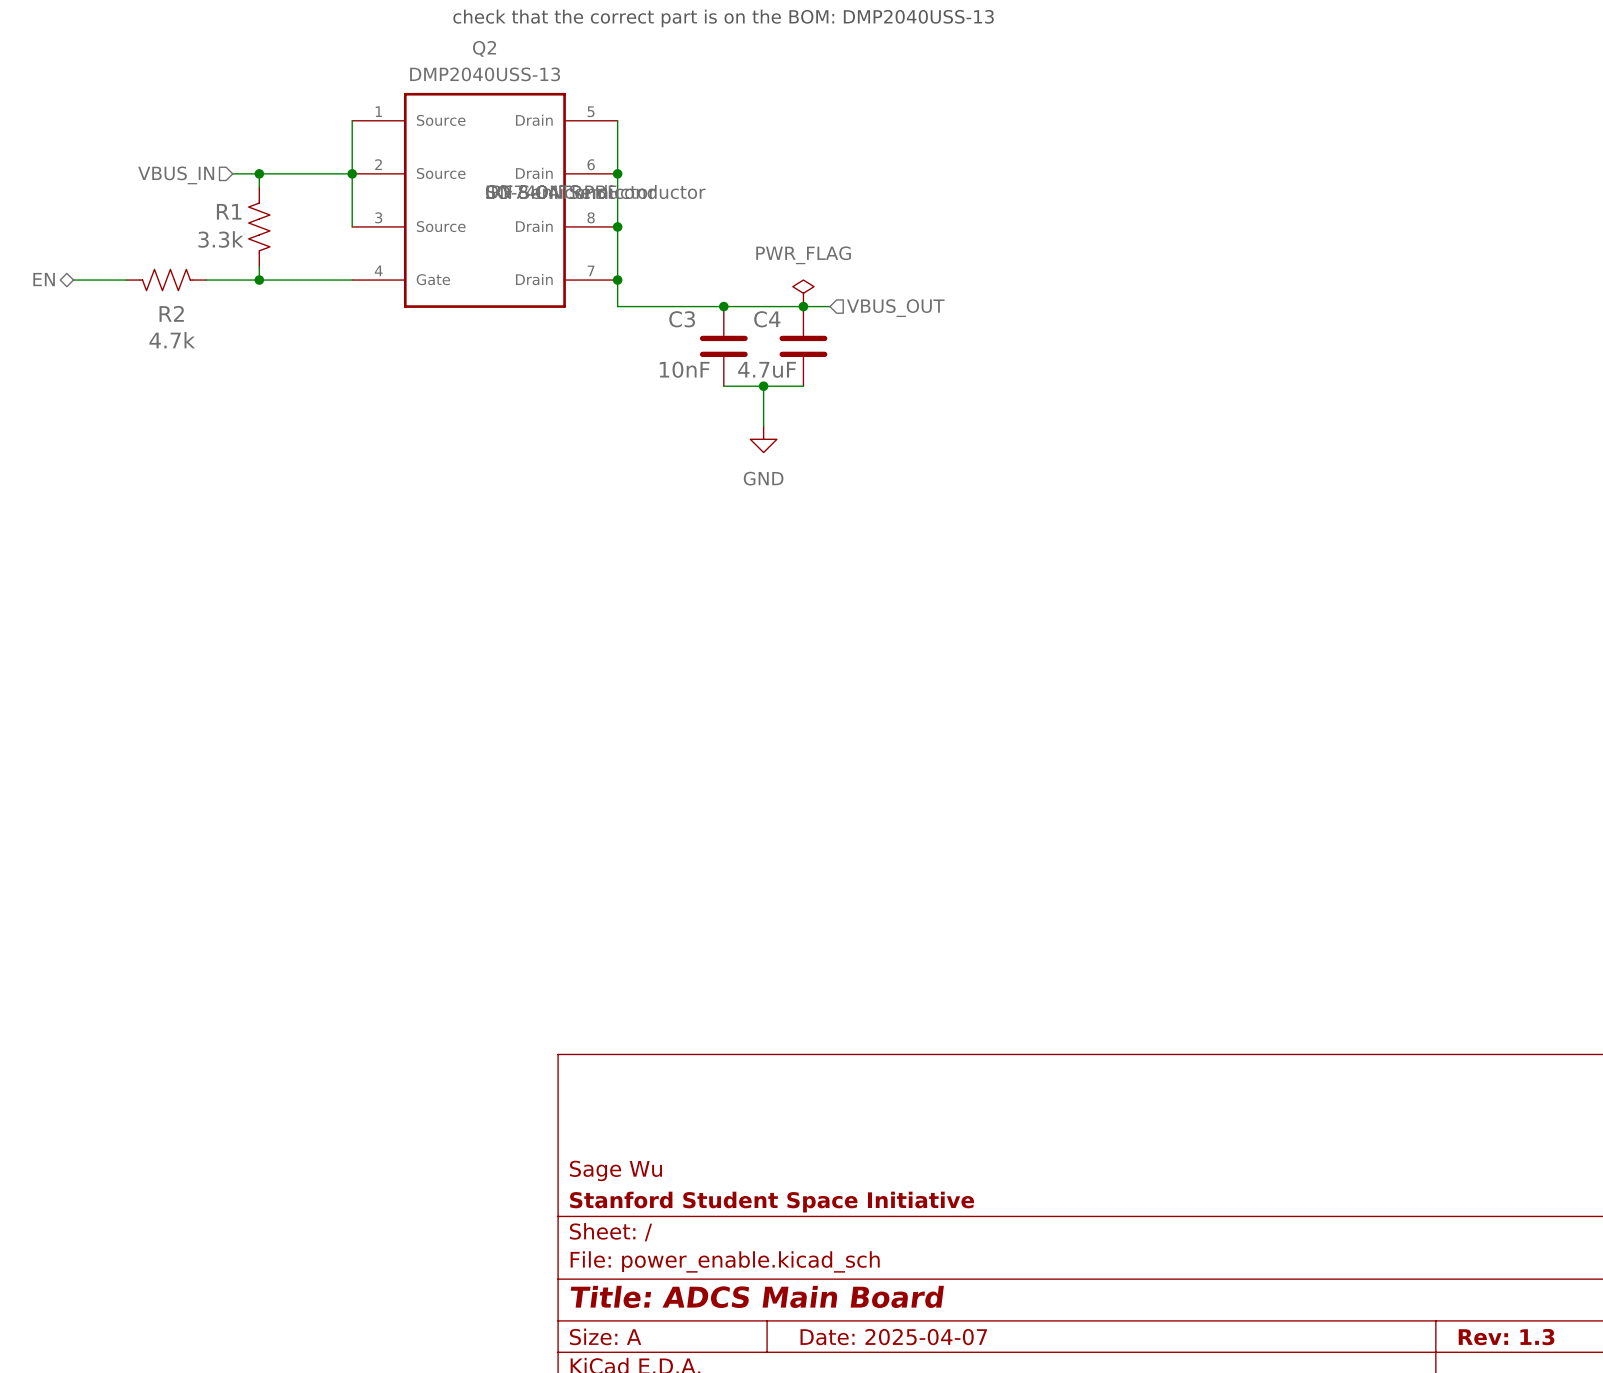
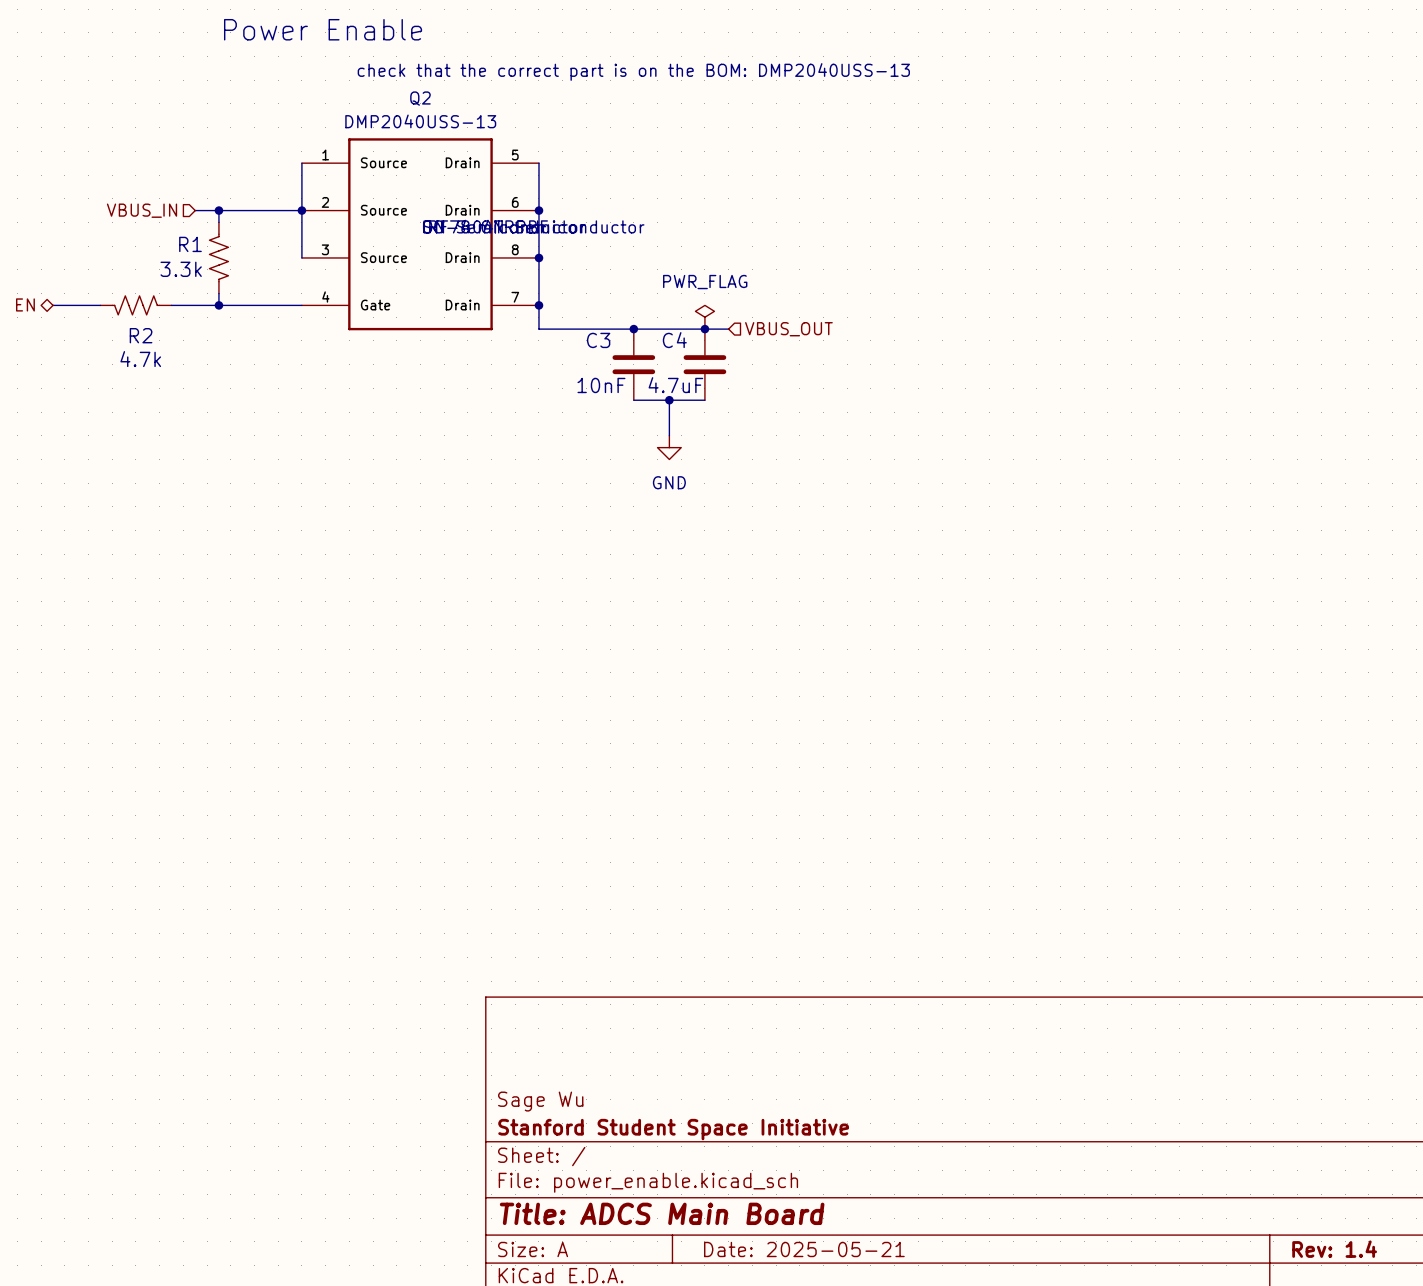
title block: Date: 2025-04-07 (893, 1337) -> Date: 2025-05-21 (804, 1249)
title block: Rev: 1.3 (1506, 1337) -> Rev: 1.4 (1334, 1249)

